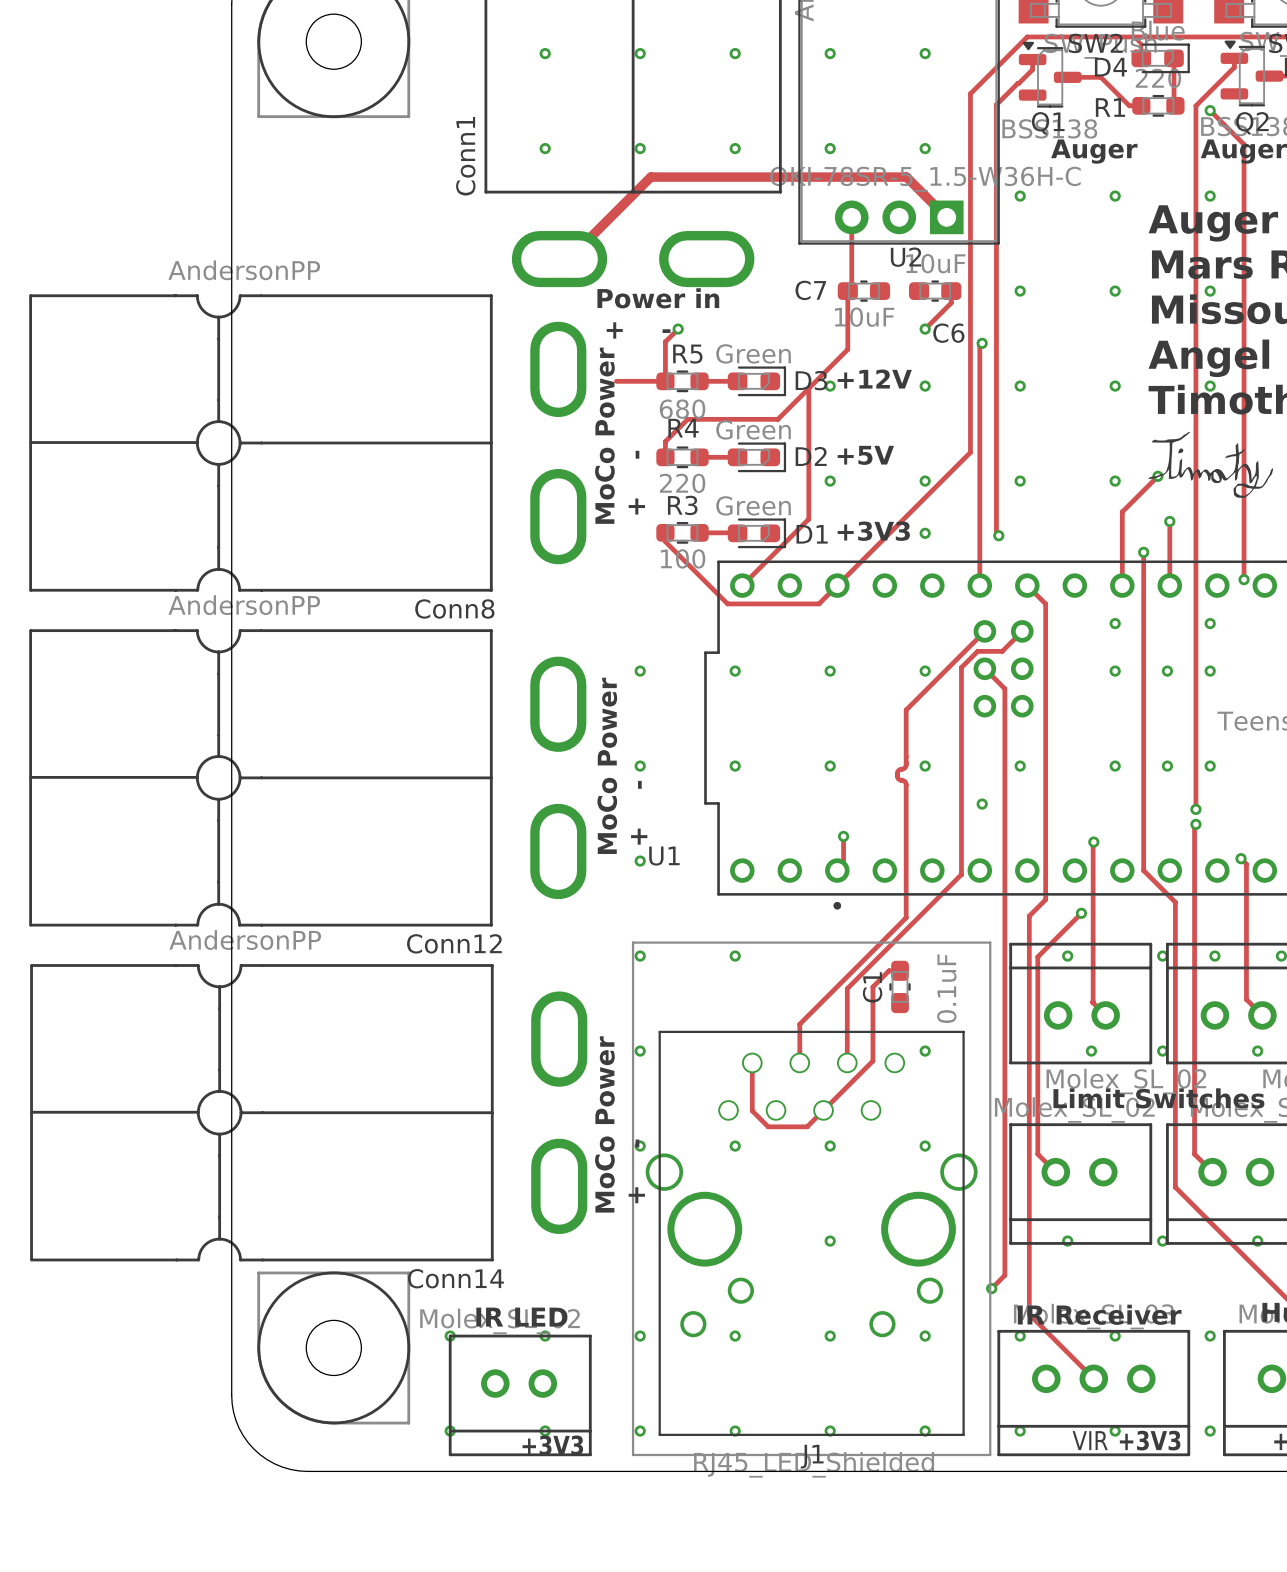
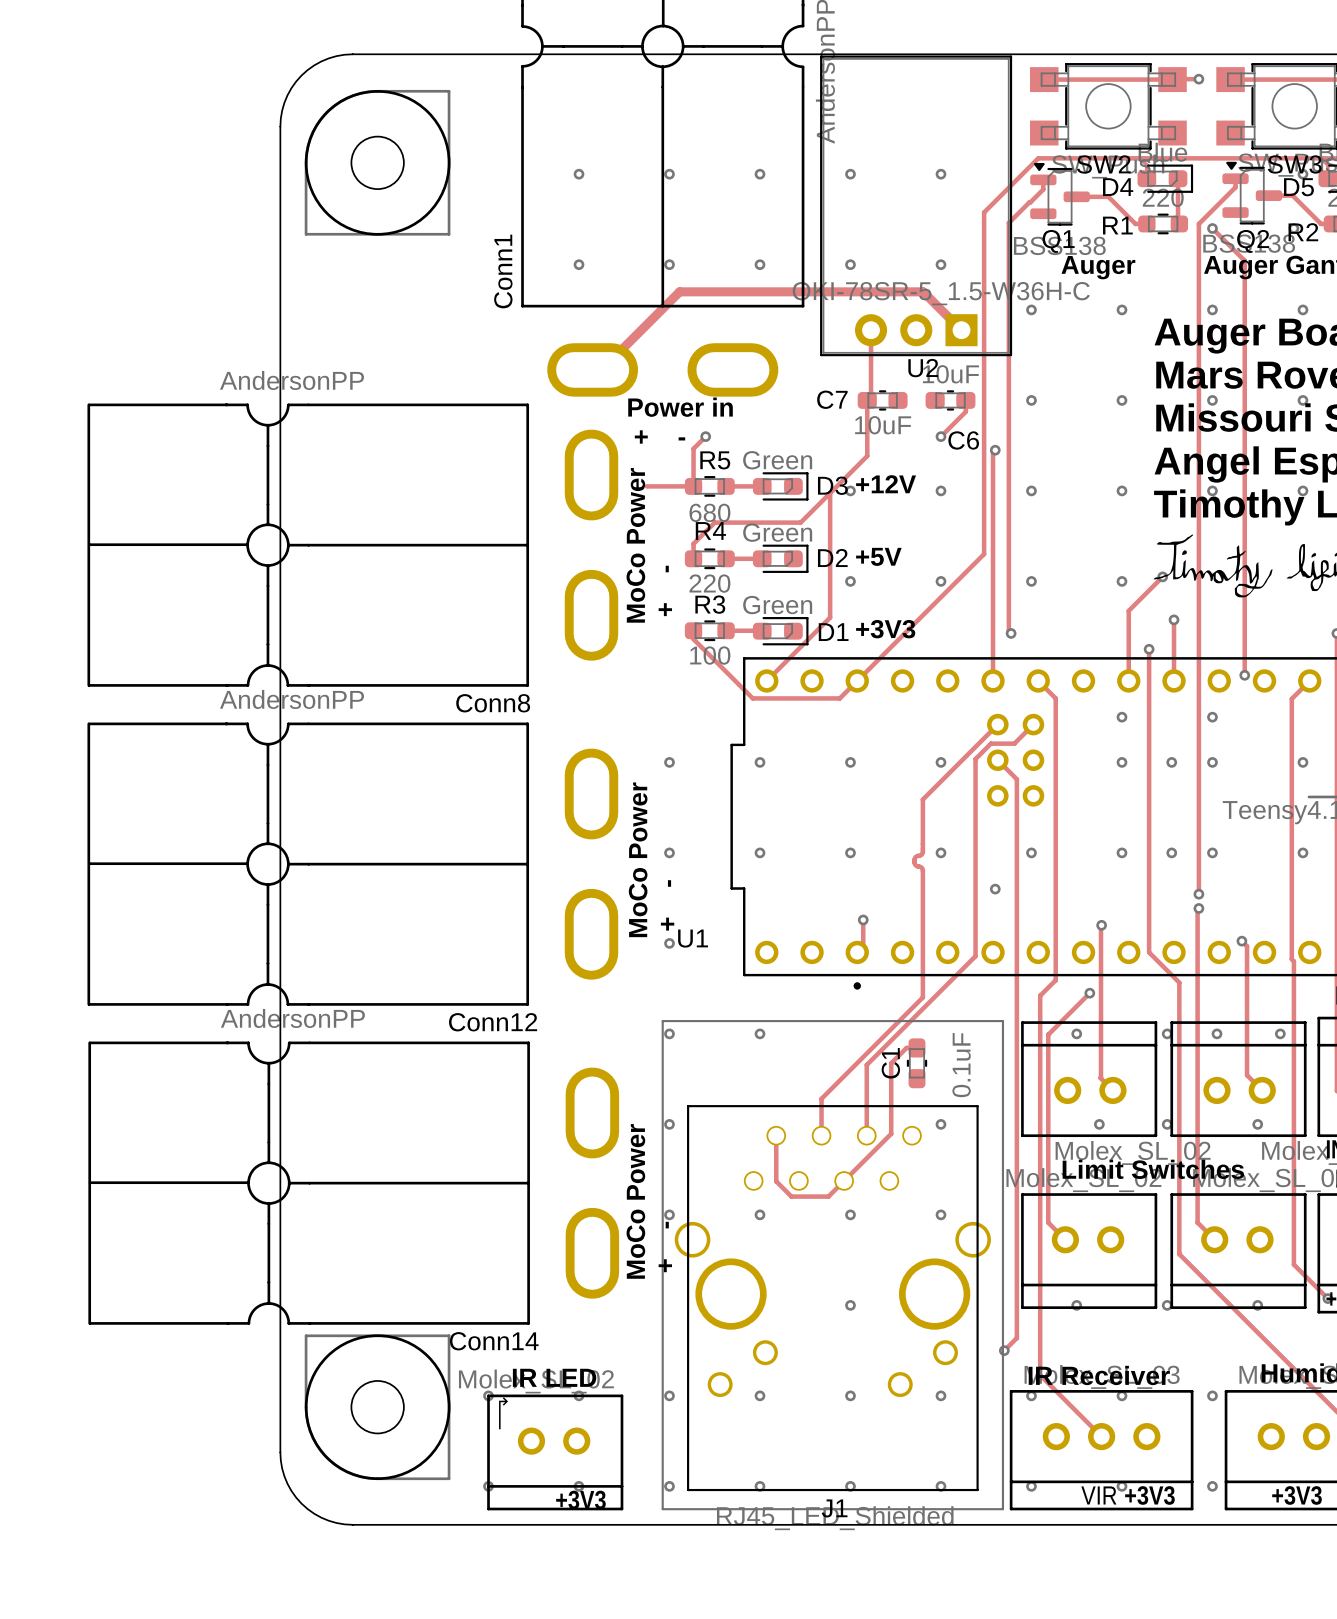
via: (925, 533) -> none

